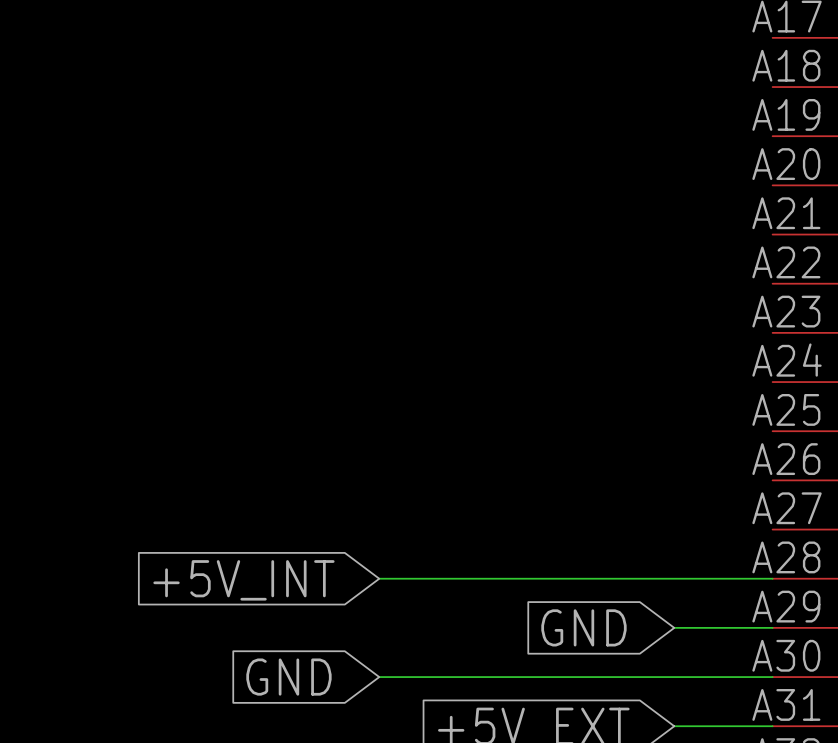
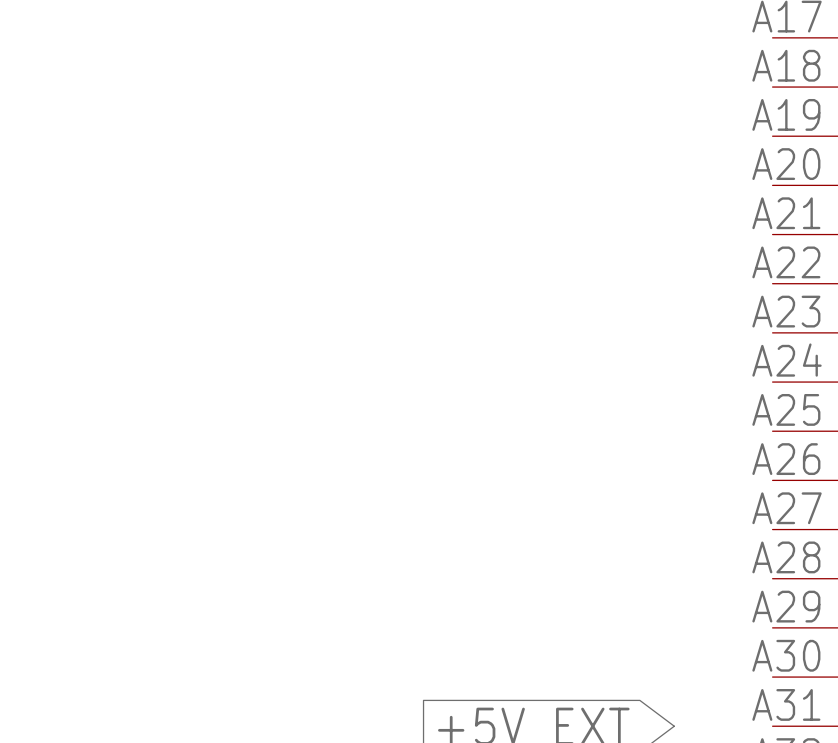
wire: (379, 578) (772, 578) -> none
global label: +5V_INT (243, 580) -> none
global label: GND (583, 627) -> none
wire: (674, 627) (772, 627) -> none
global label: GND (288, 677) -> none
wire: (379, 677) (772, 677) -> none
wire: (674, 726) (772, 726) -> none

